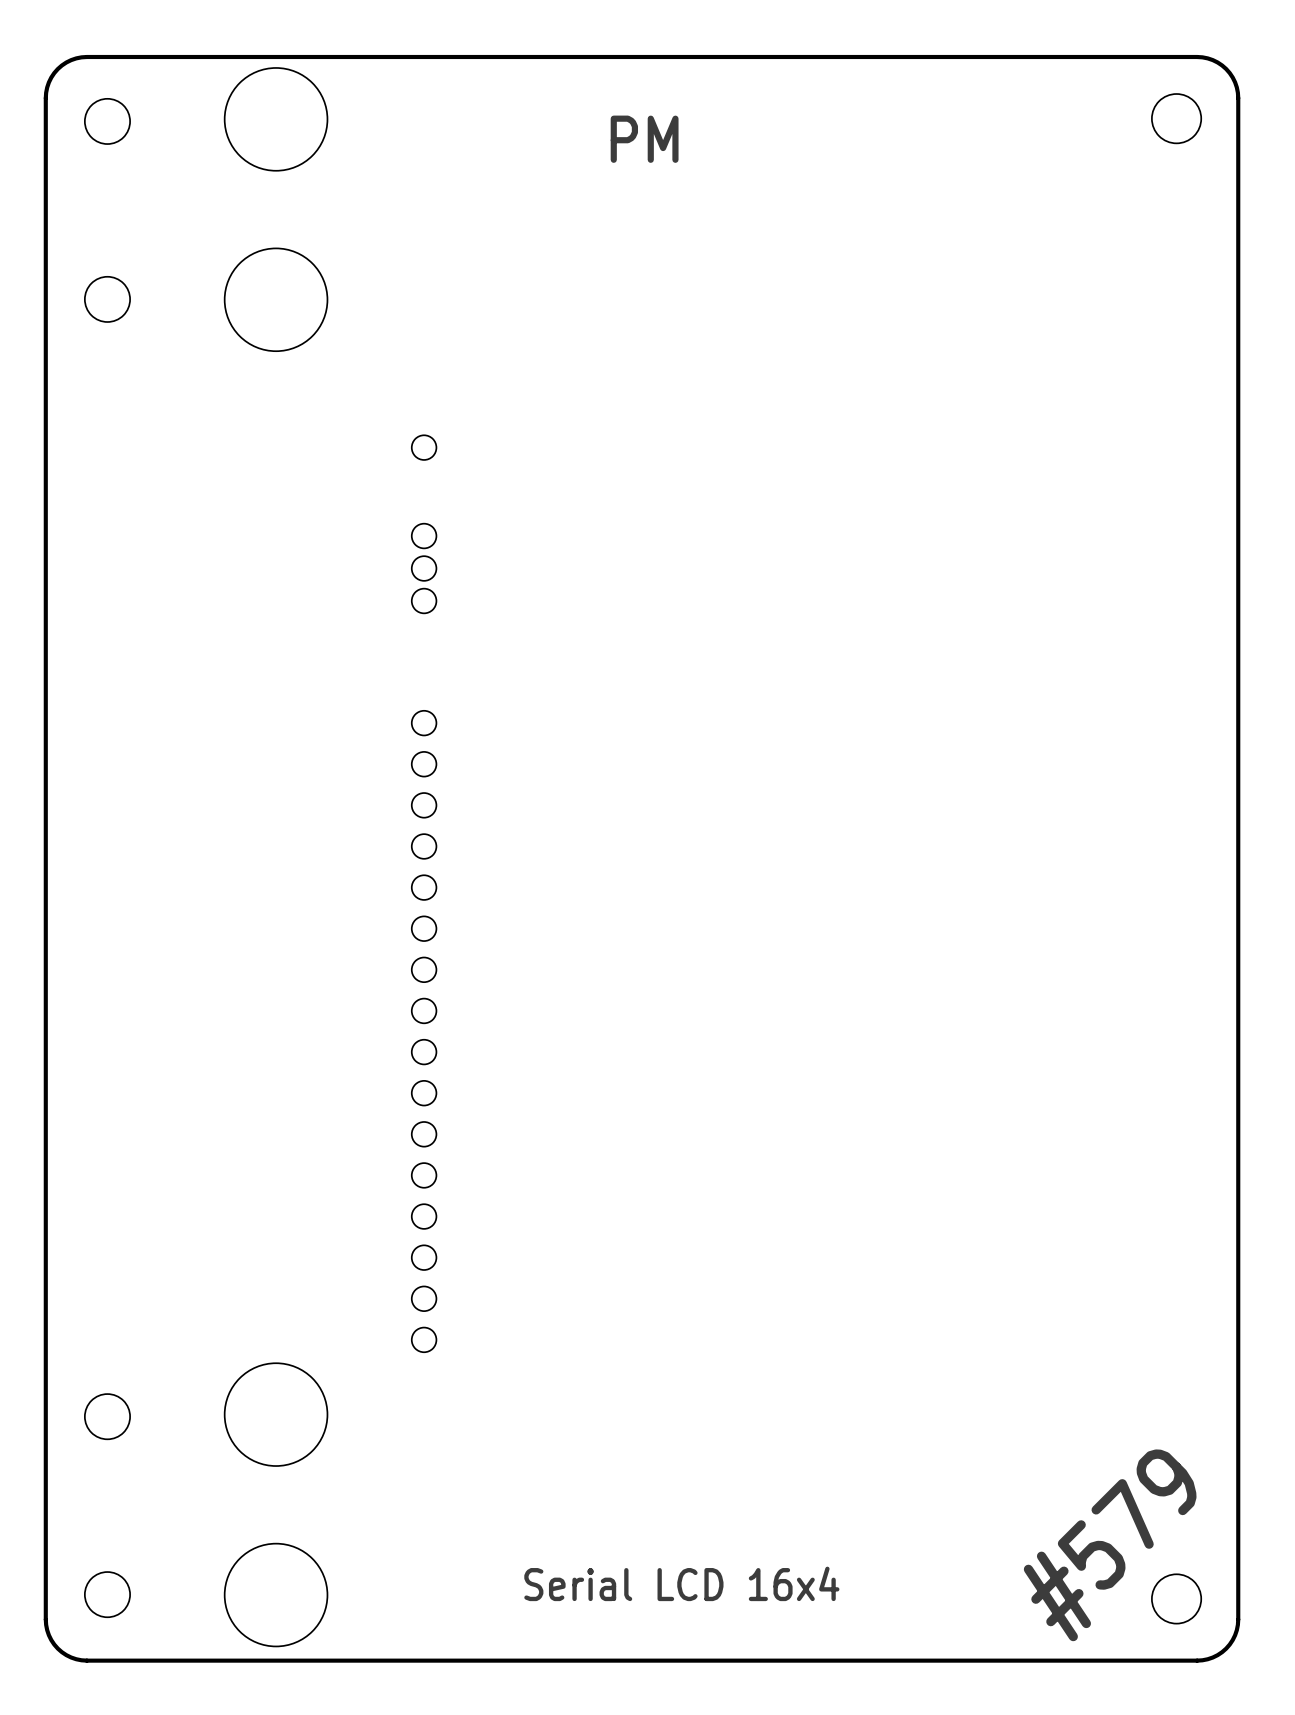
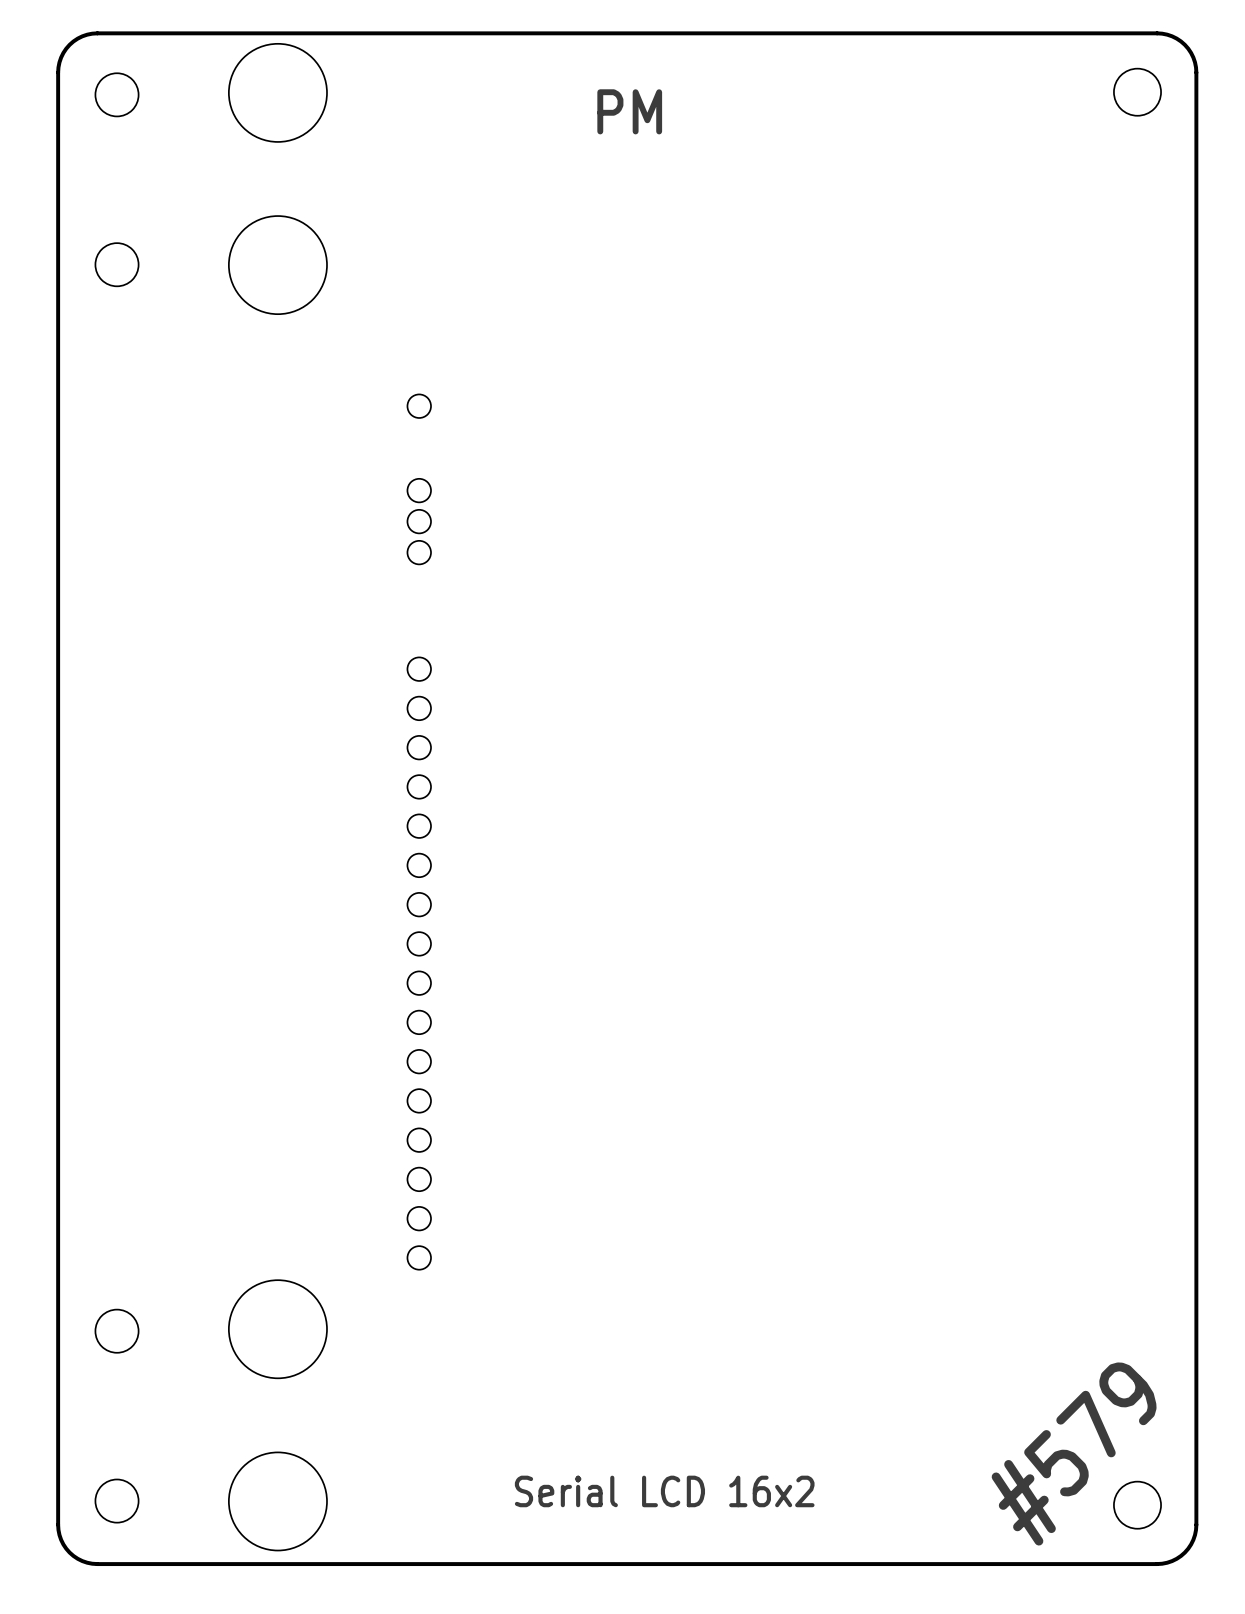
text: Serial LCD 16x4 (681, 1583) -> Serial LCD 16x2 (664, 1491)

